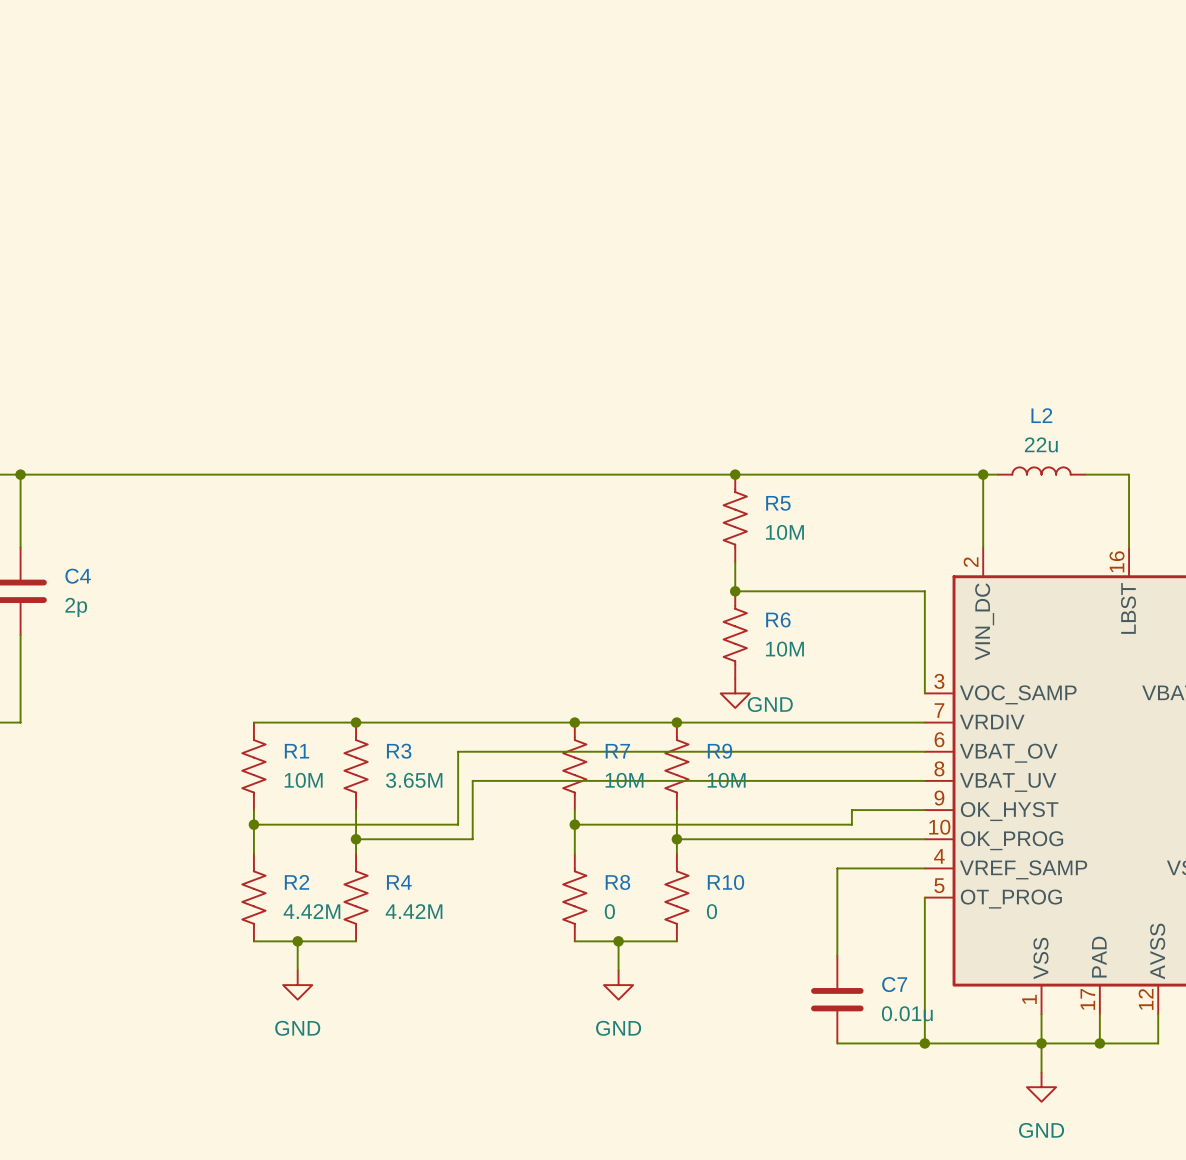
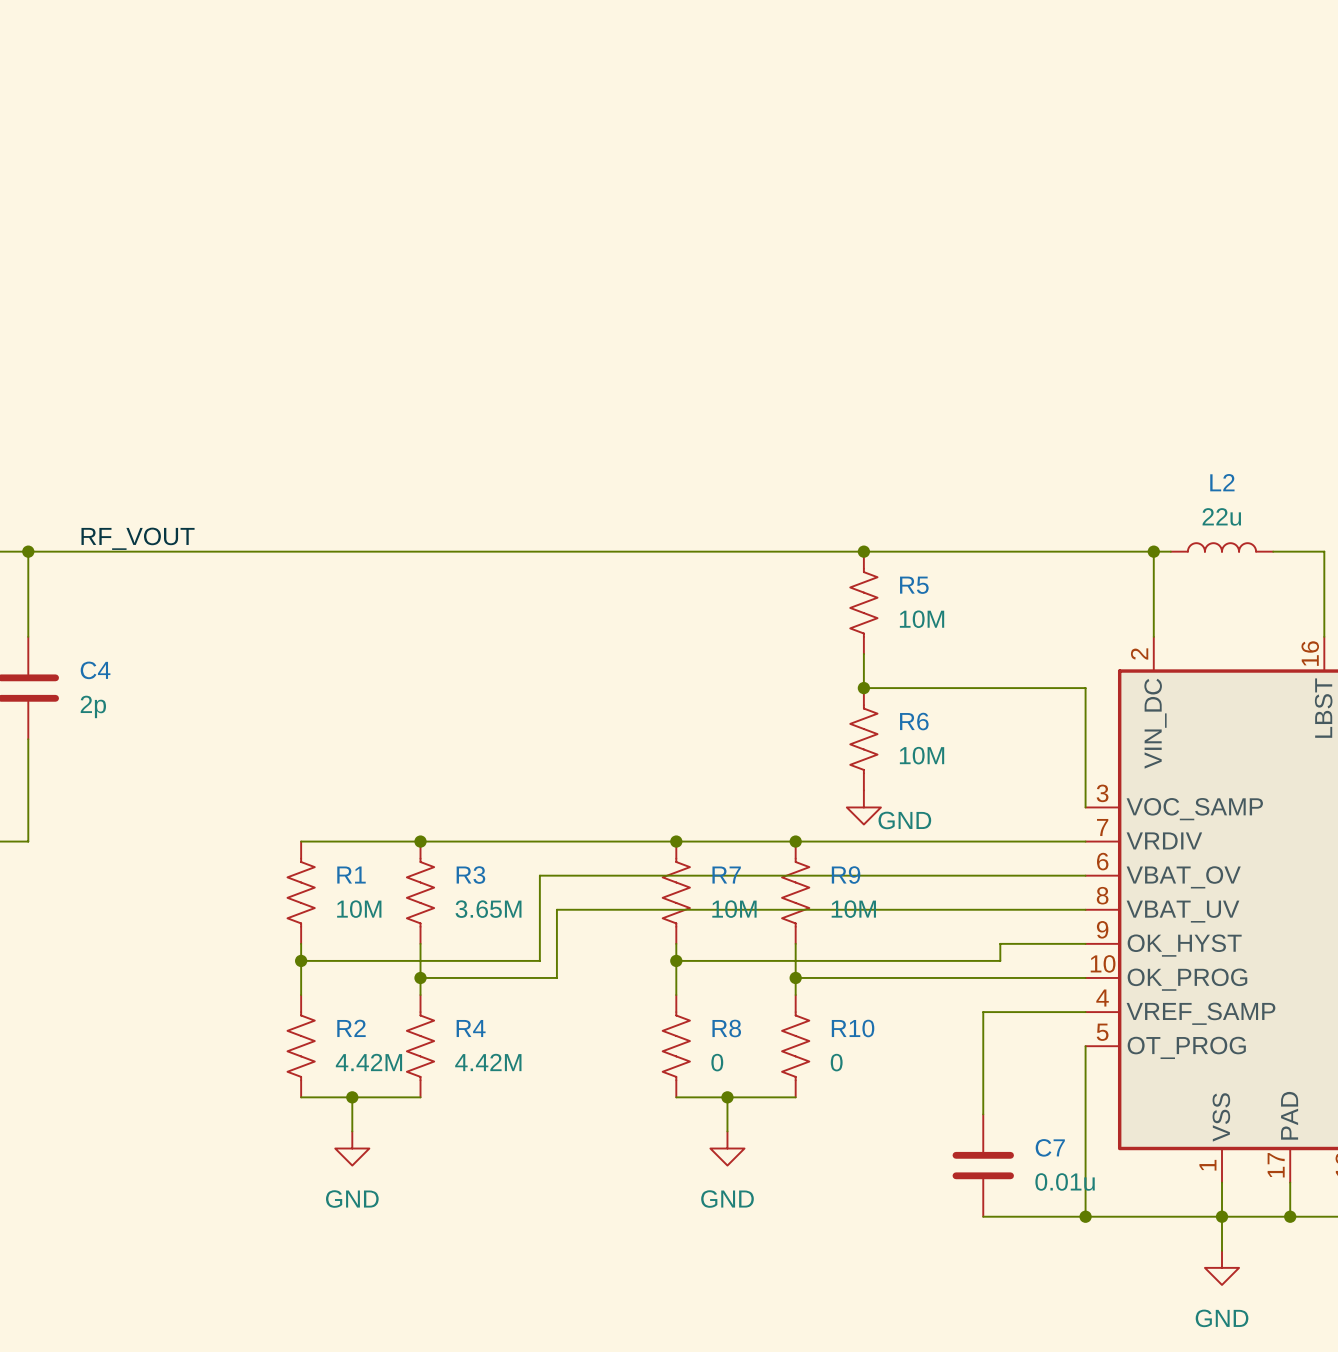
label: none -> RF_VOUT (138, 538)

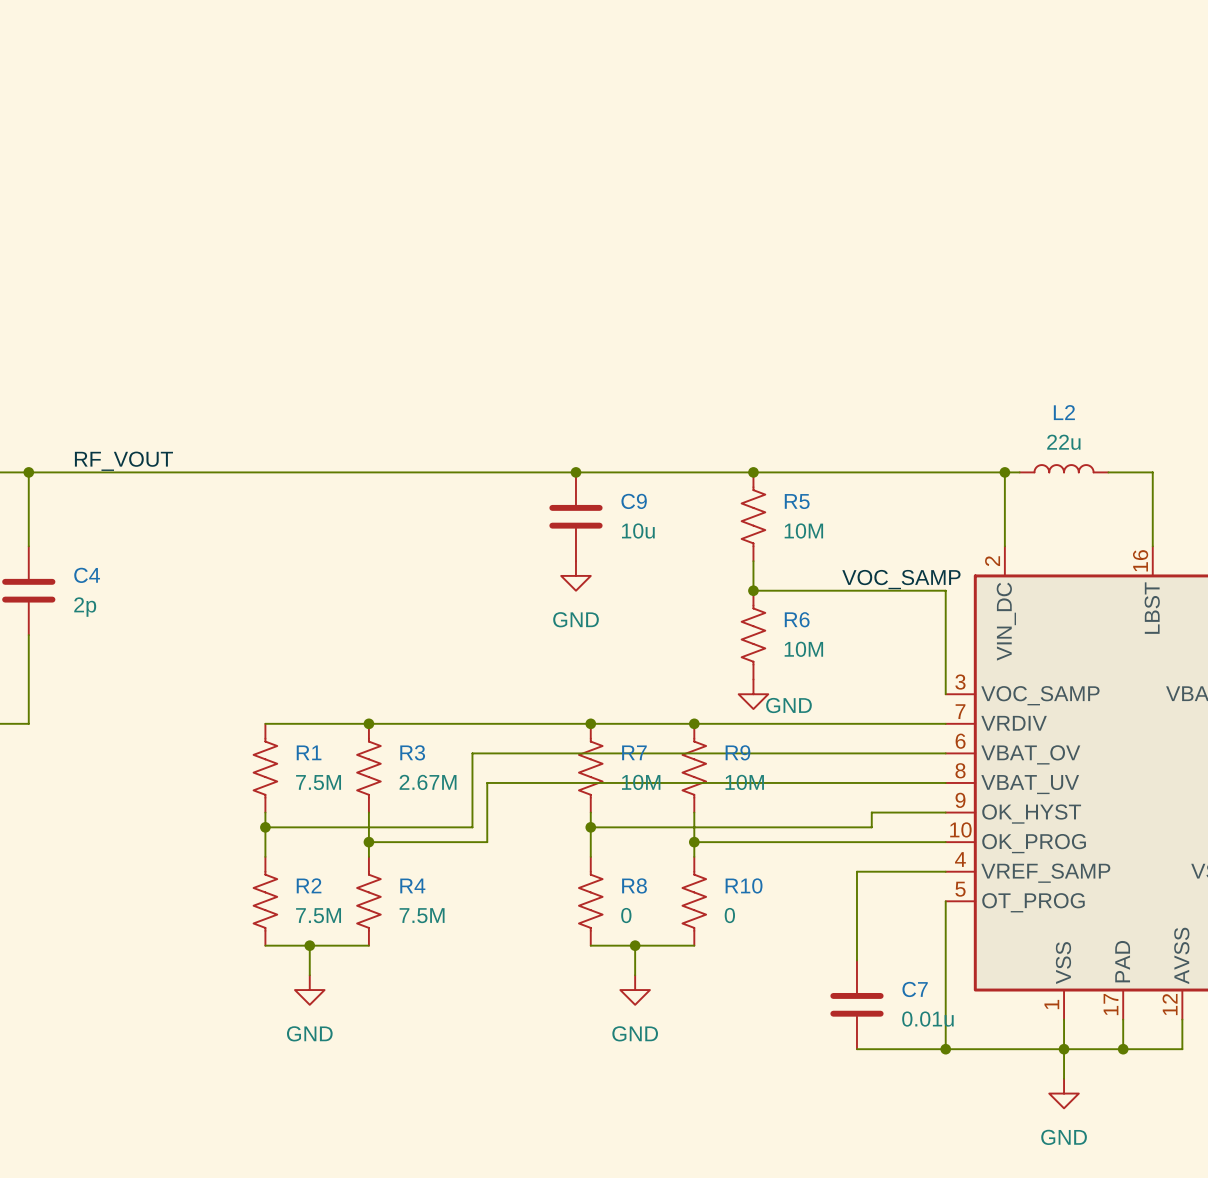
junction: none -> (575, 472)
C9: none -> 10u (575, 516)
power symbol: none -> GND (575, 575)
label: none -> VOC_SAMP (901, 579)
R1 value: 10M (359, 909) -> 7.5M (318, 782)
R3 value: 3.65M (488, 909) -> 2.67M (428, 782)
R2 value: 4.42M (368, 1062) -> 7.5M (318, 915)
R4 value: 4.42M (488, 1062) -> 7.5M (422, 915)

